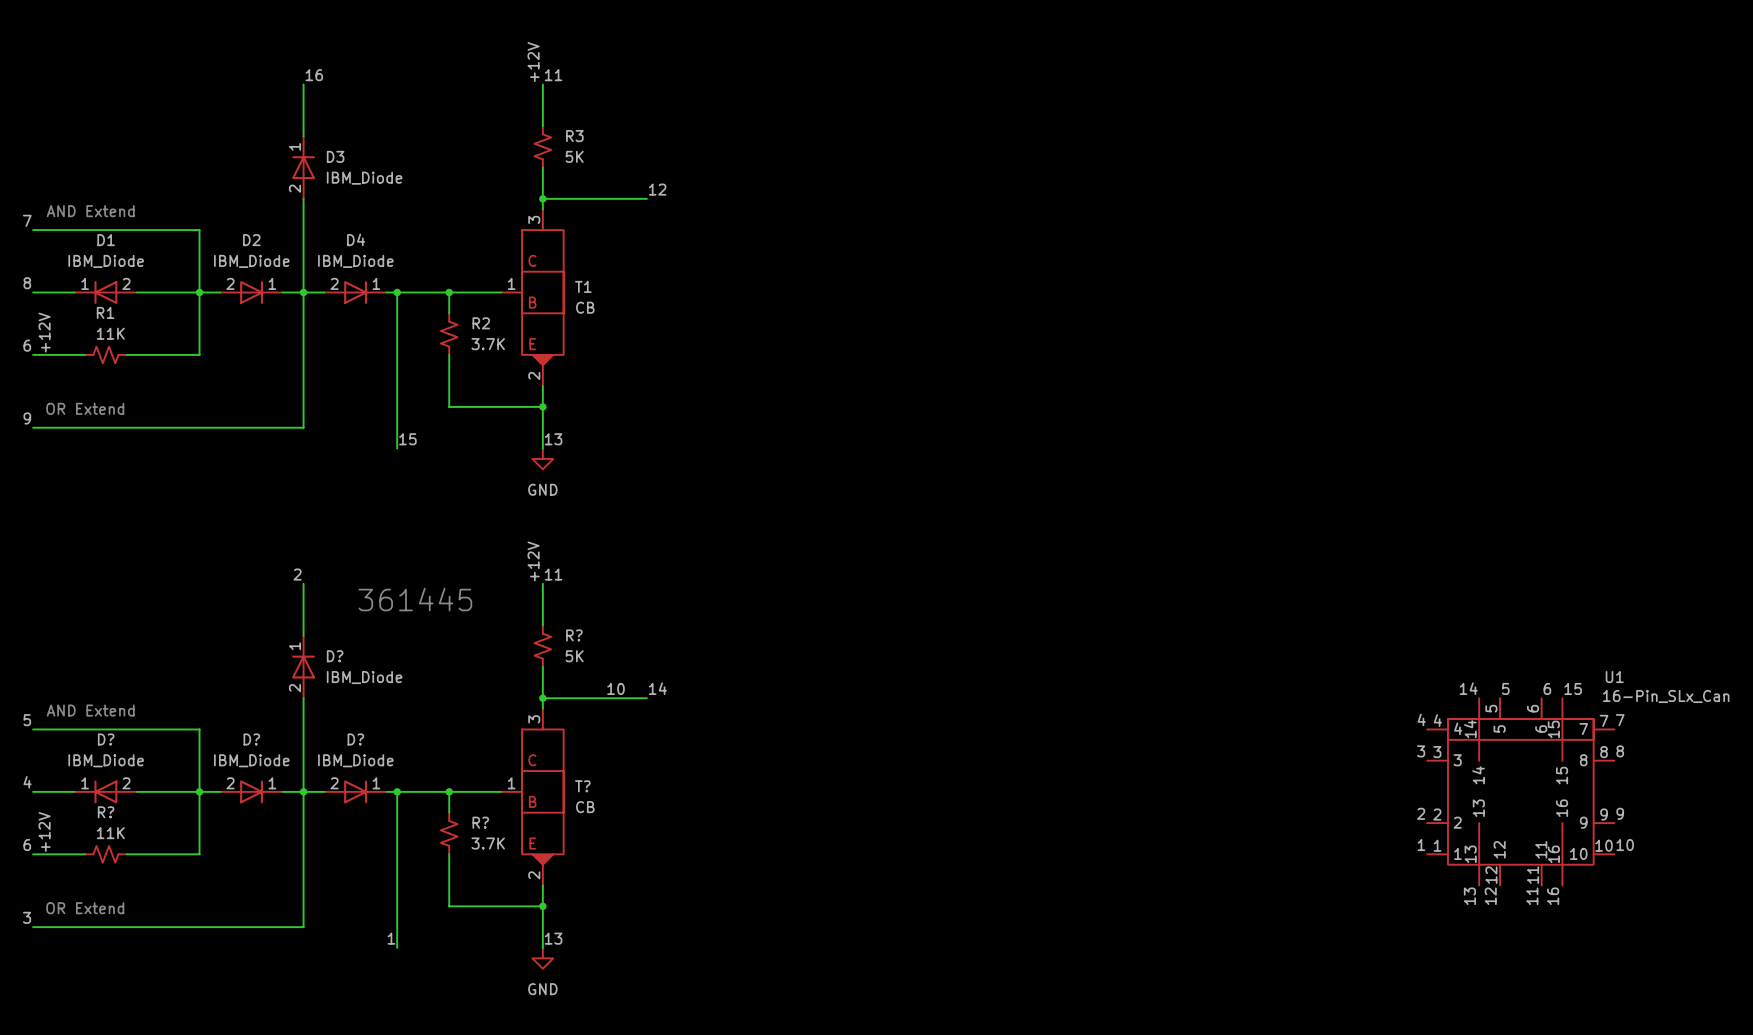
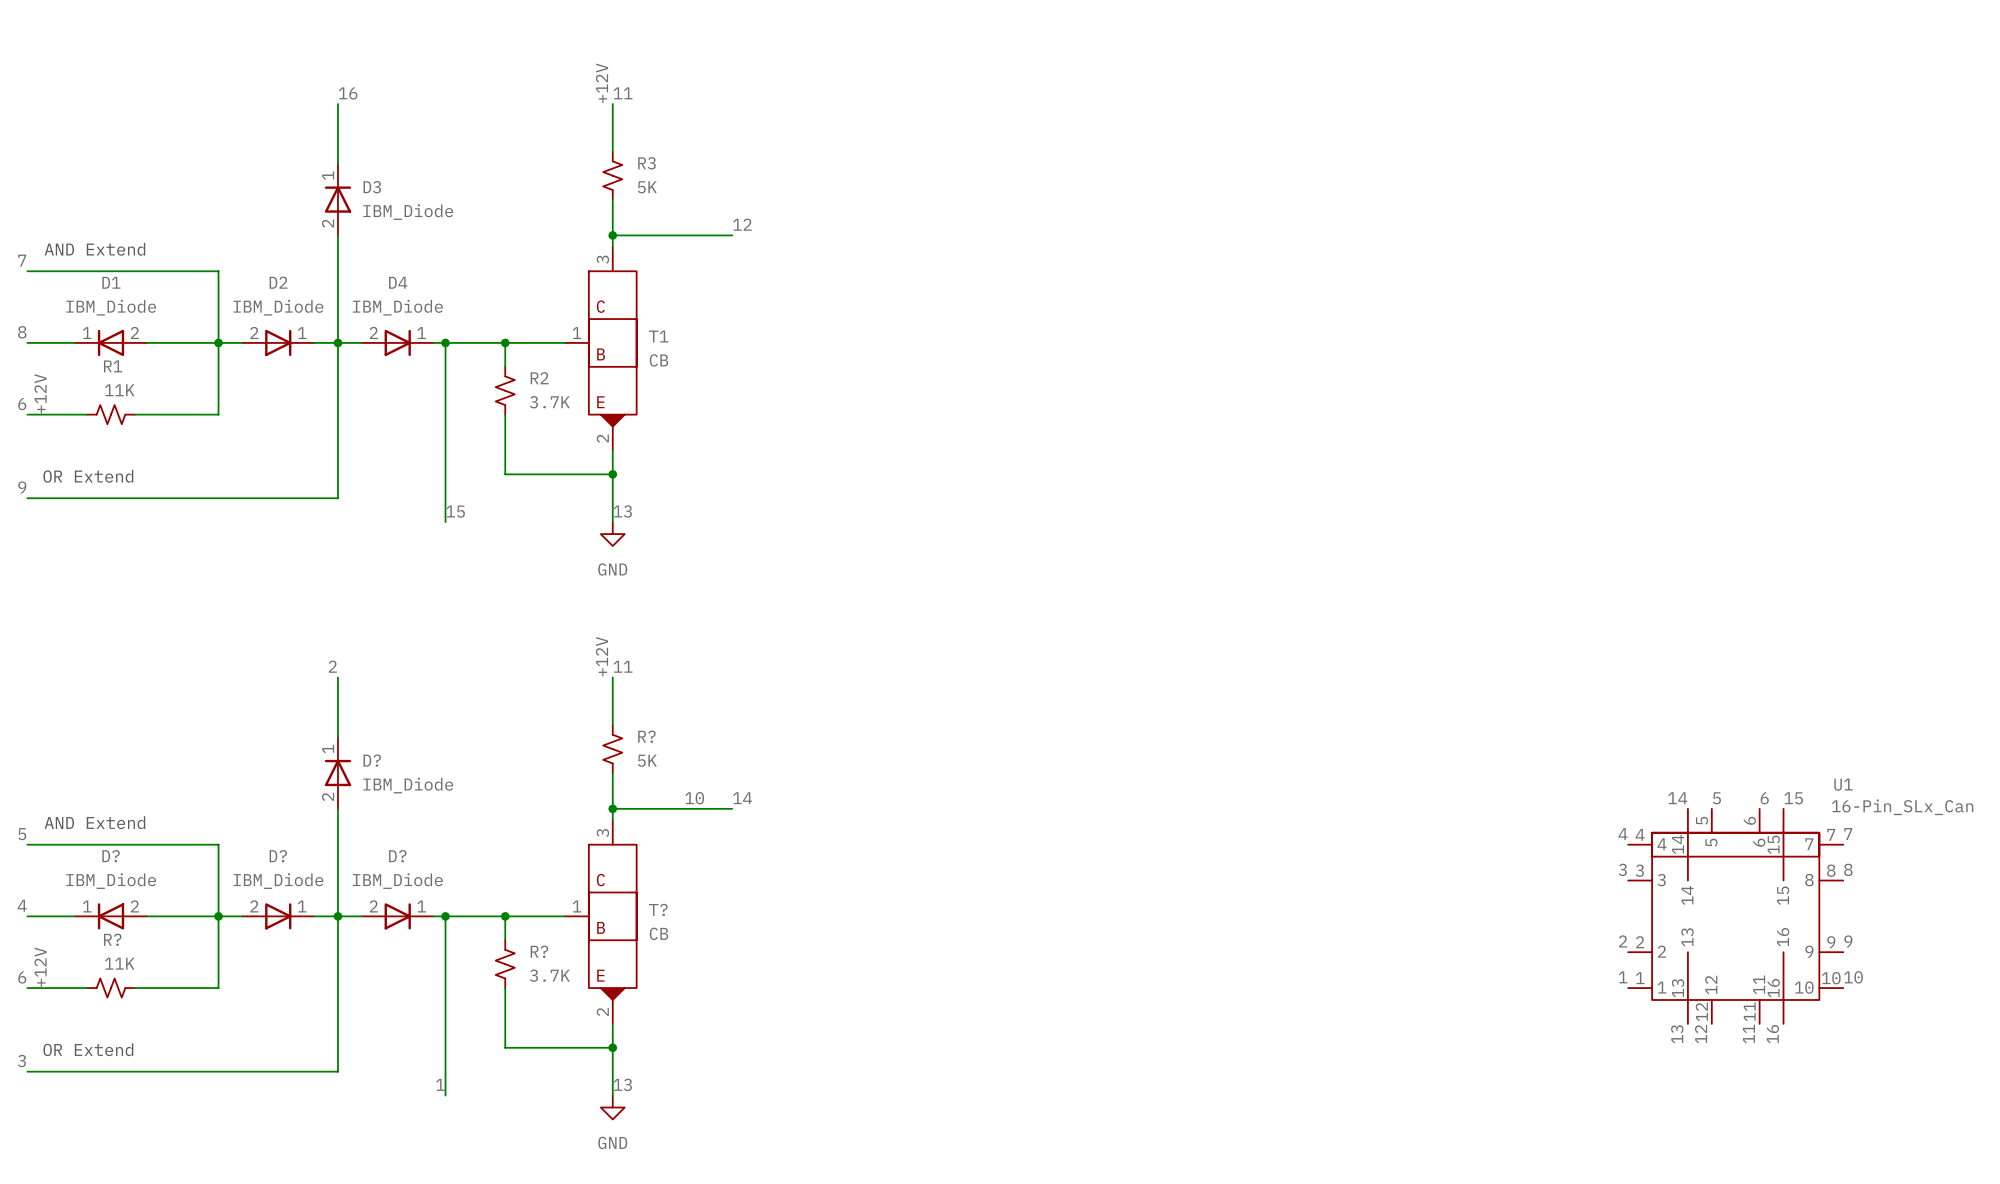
text: 361445 (415, 599) -> none

